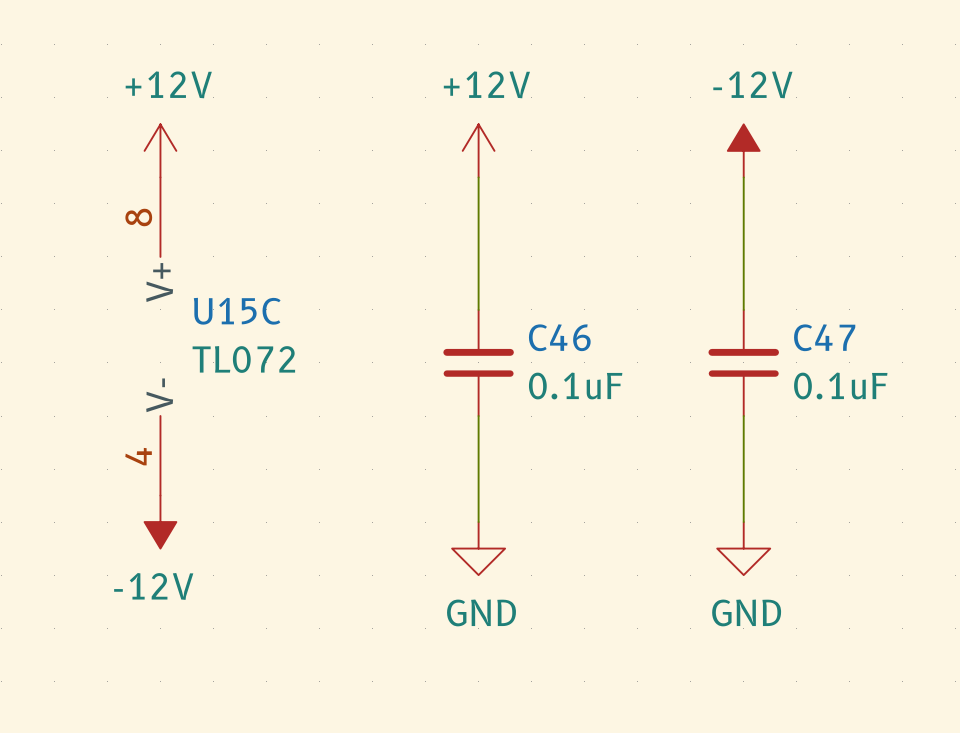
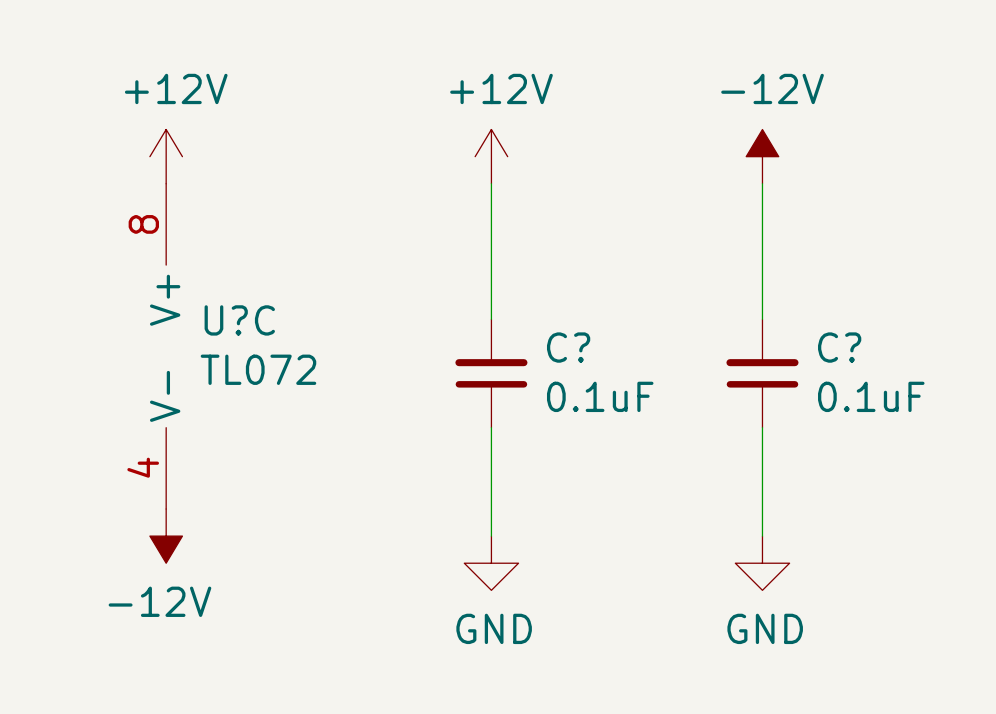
U15C name: U15C (237, 311) -> U?C (239, 320)
C46 name: C46 (559, 337) -> C? (568, 347)
C47 name: C47 (824, 337) -> C? (839, 347)

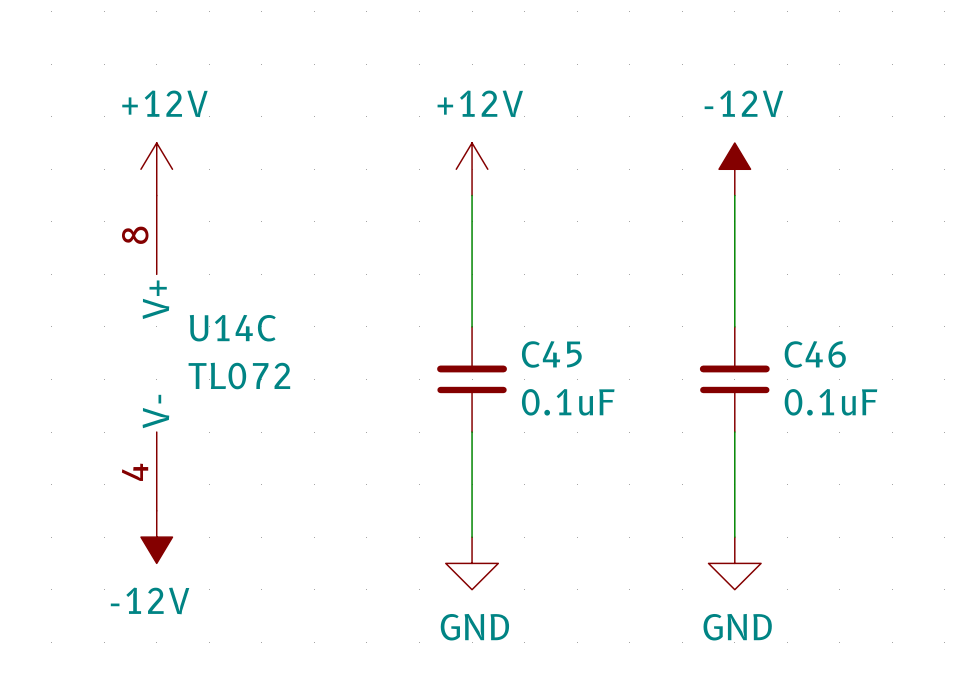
U?C name: U?C (239, 320) -> U14C (232, 328)
C? name: C? (568, 347) -> C45 (551, 354)
C? name: C? (839, 347) -> C46 (815, 354)

